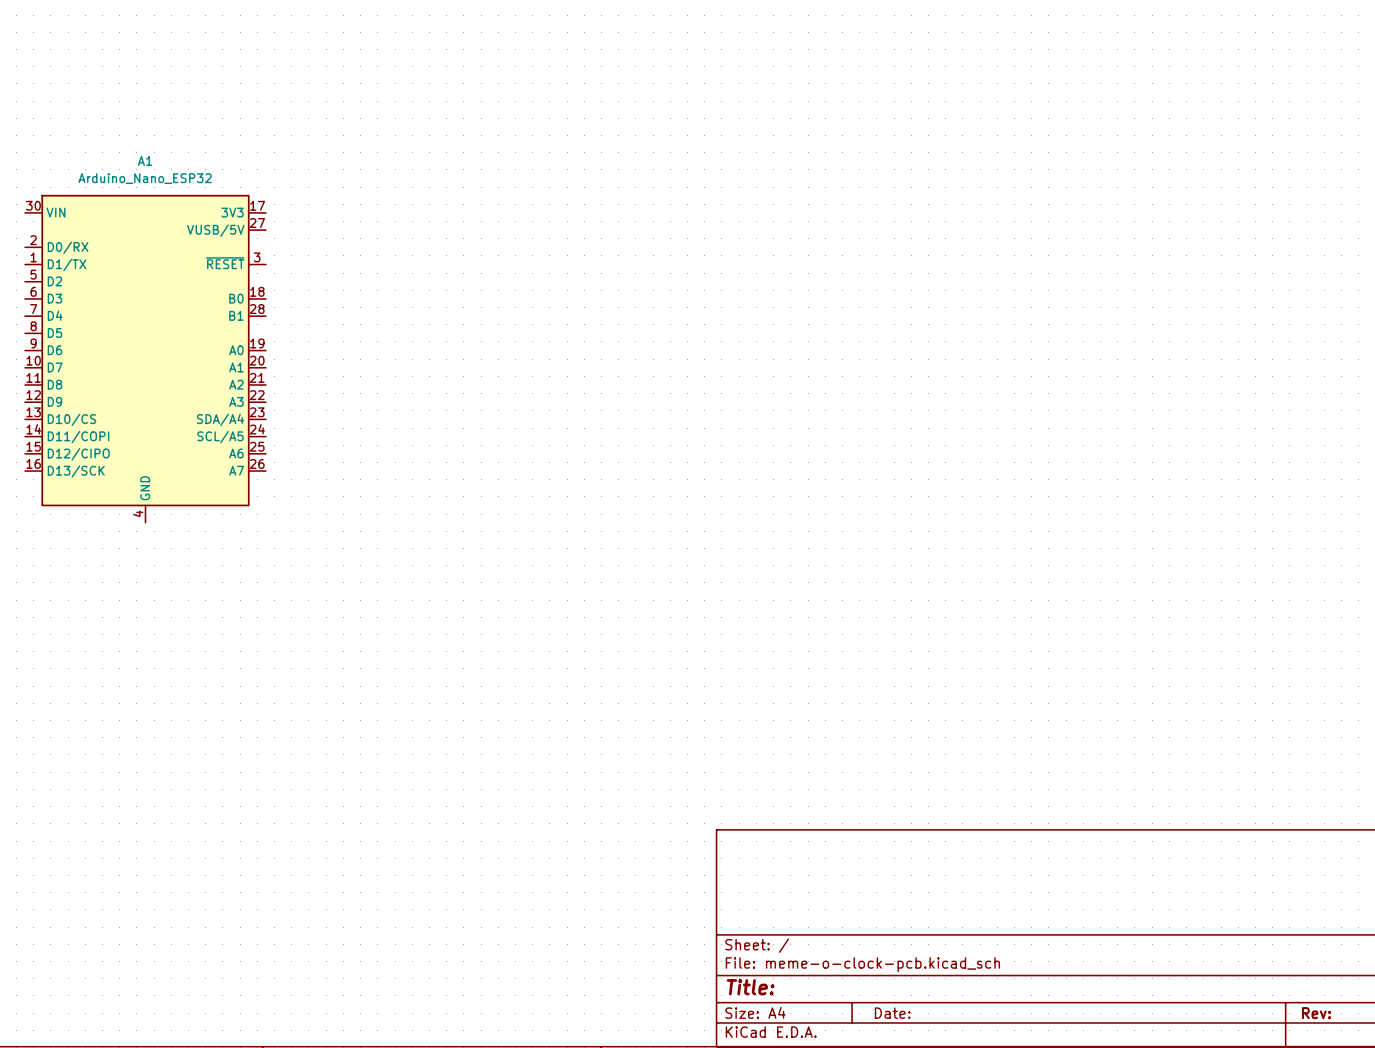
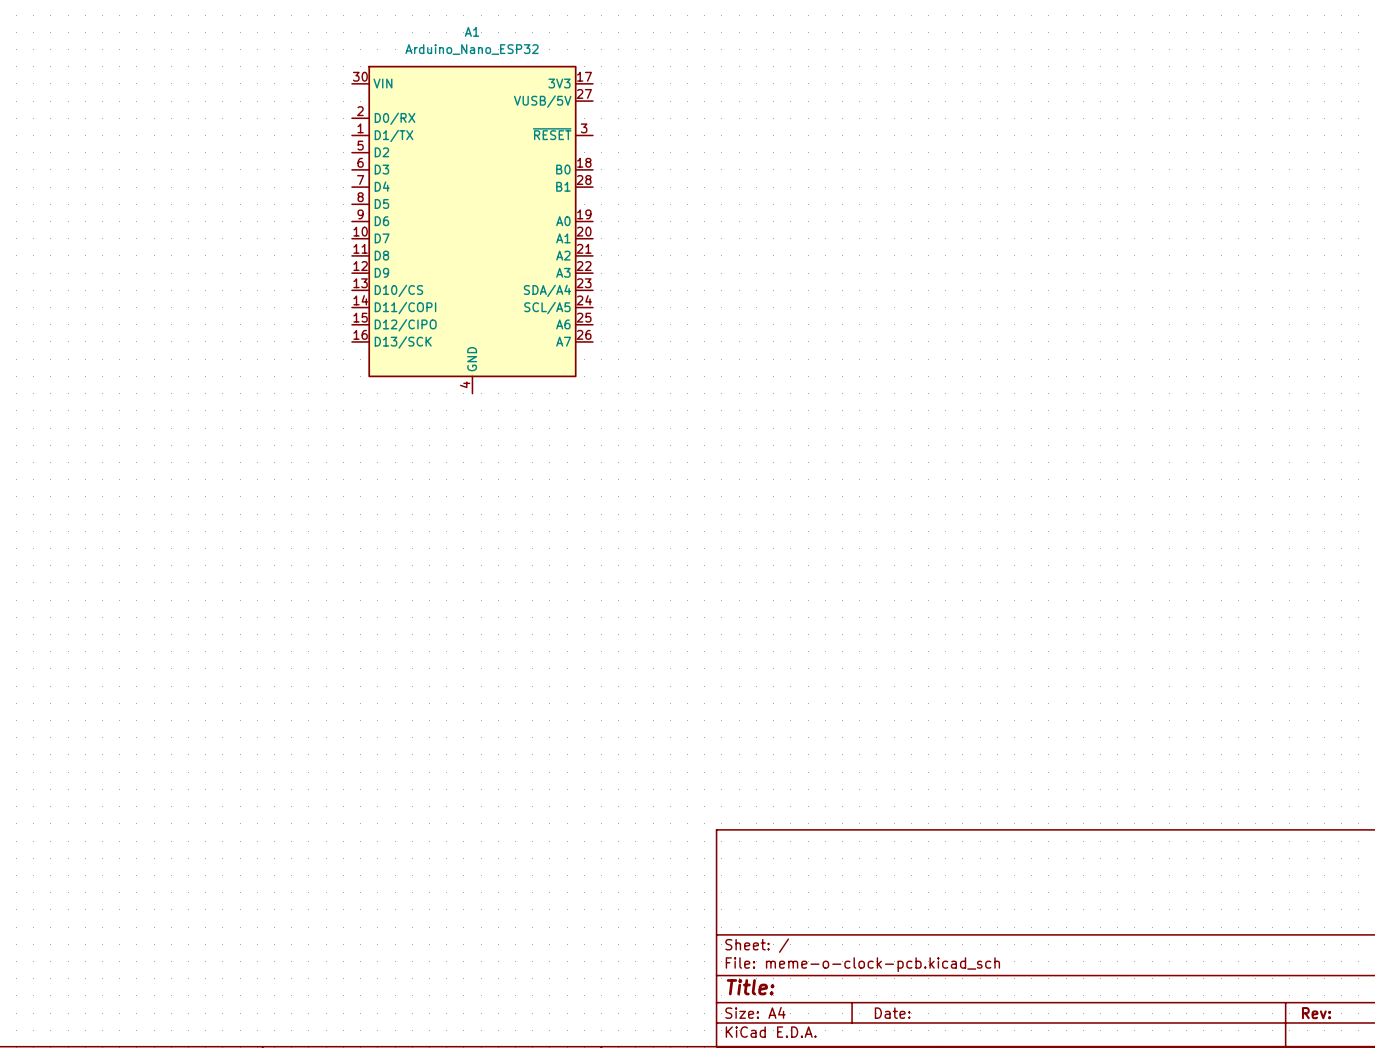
A1 position: (145, 358) -> (472, 229)

